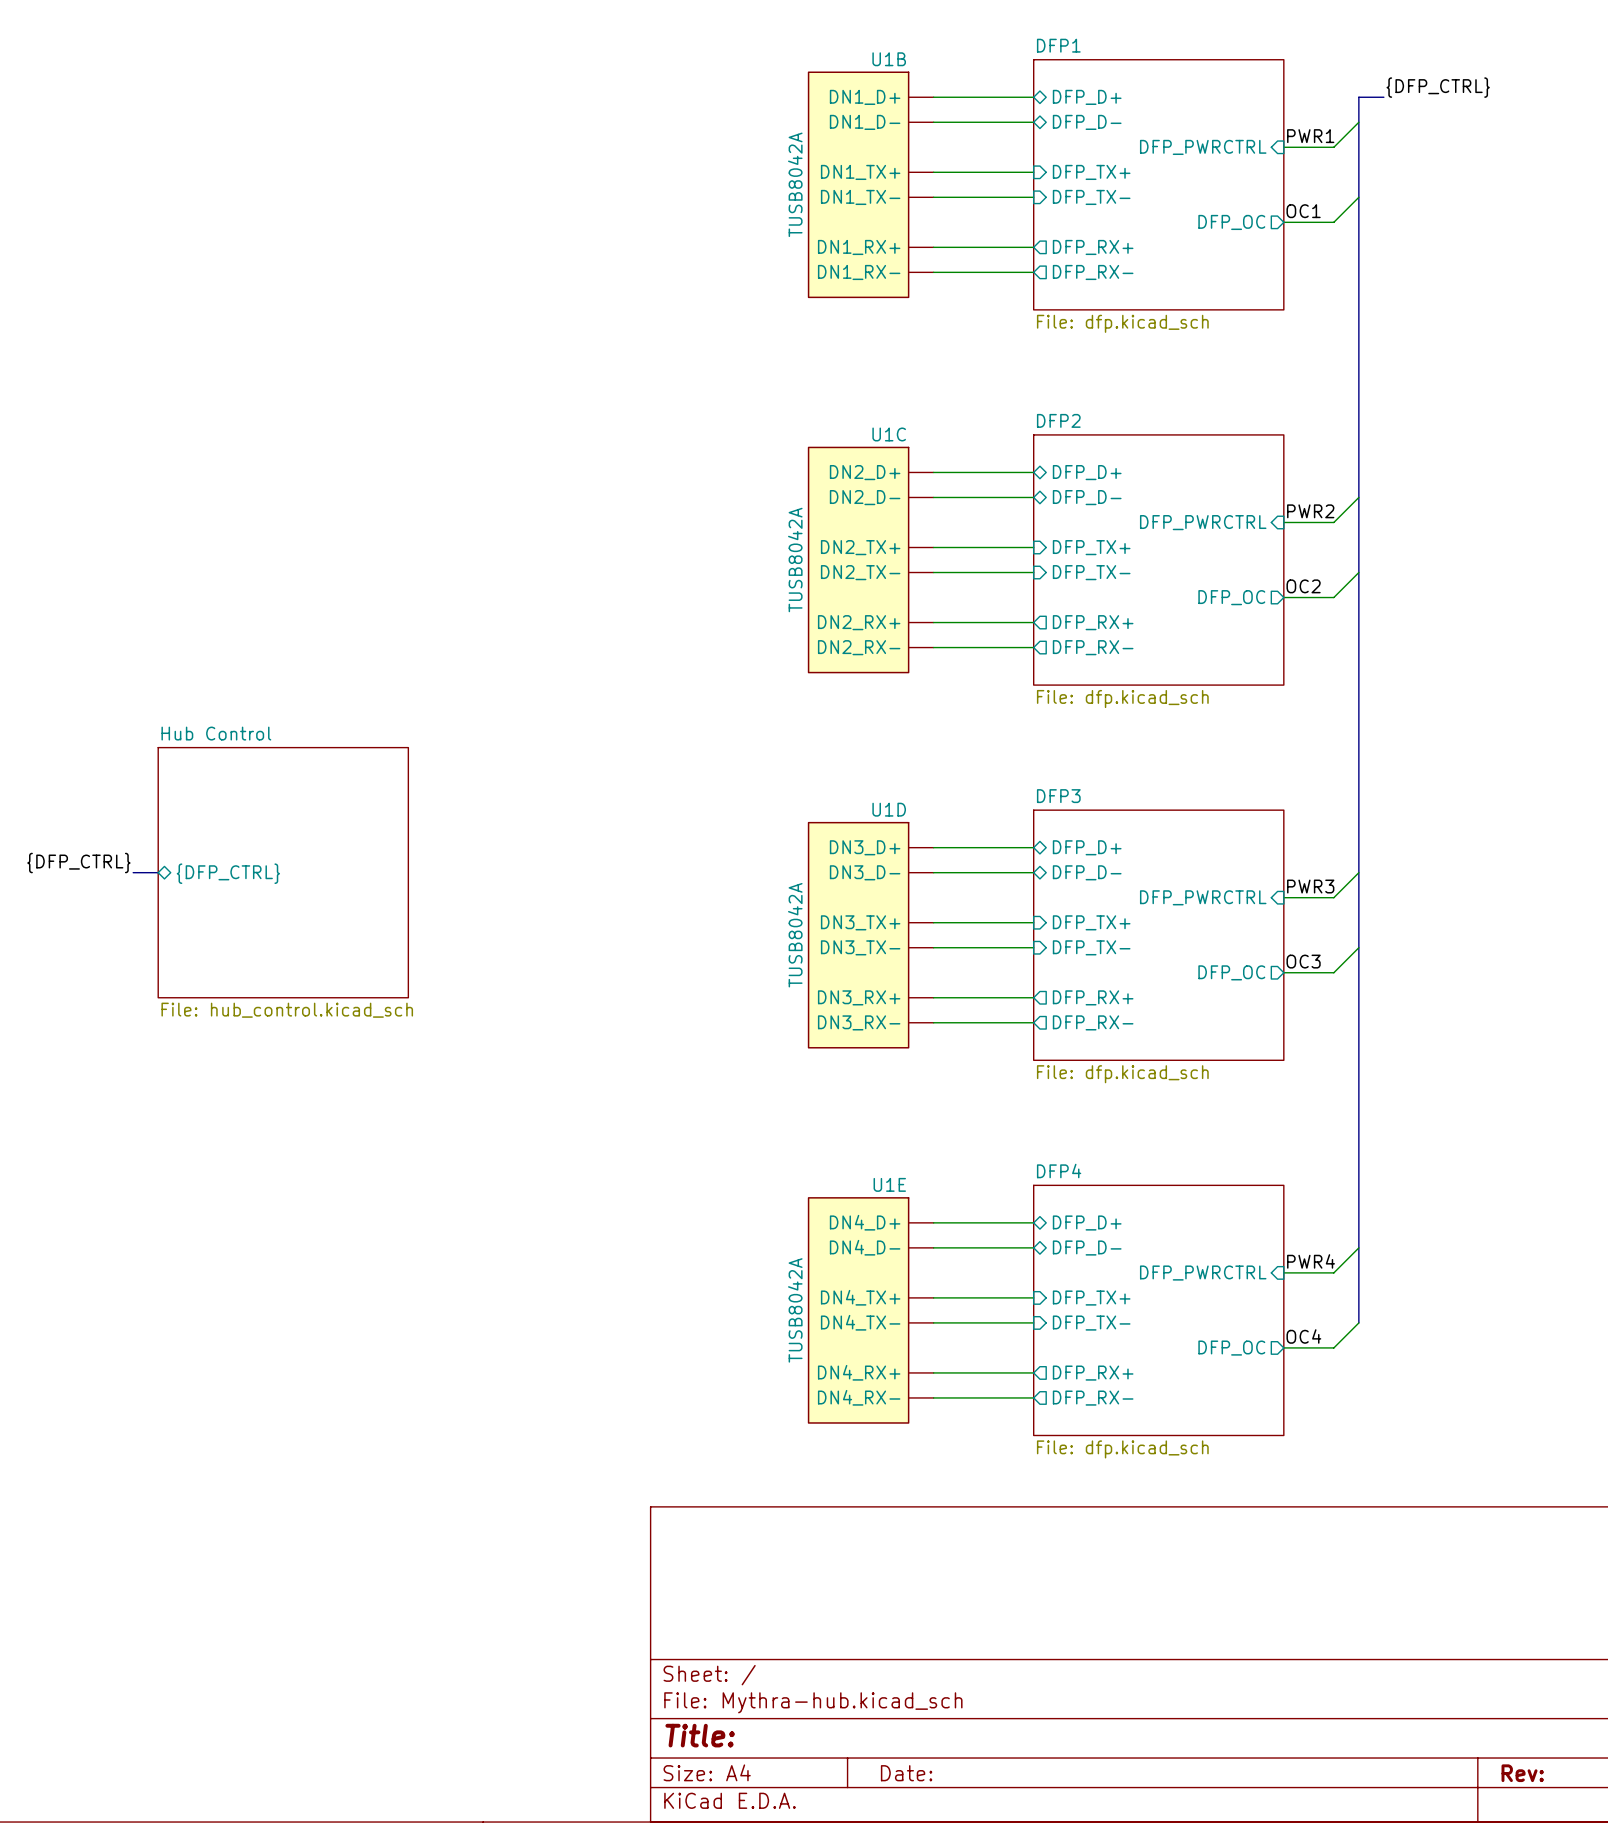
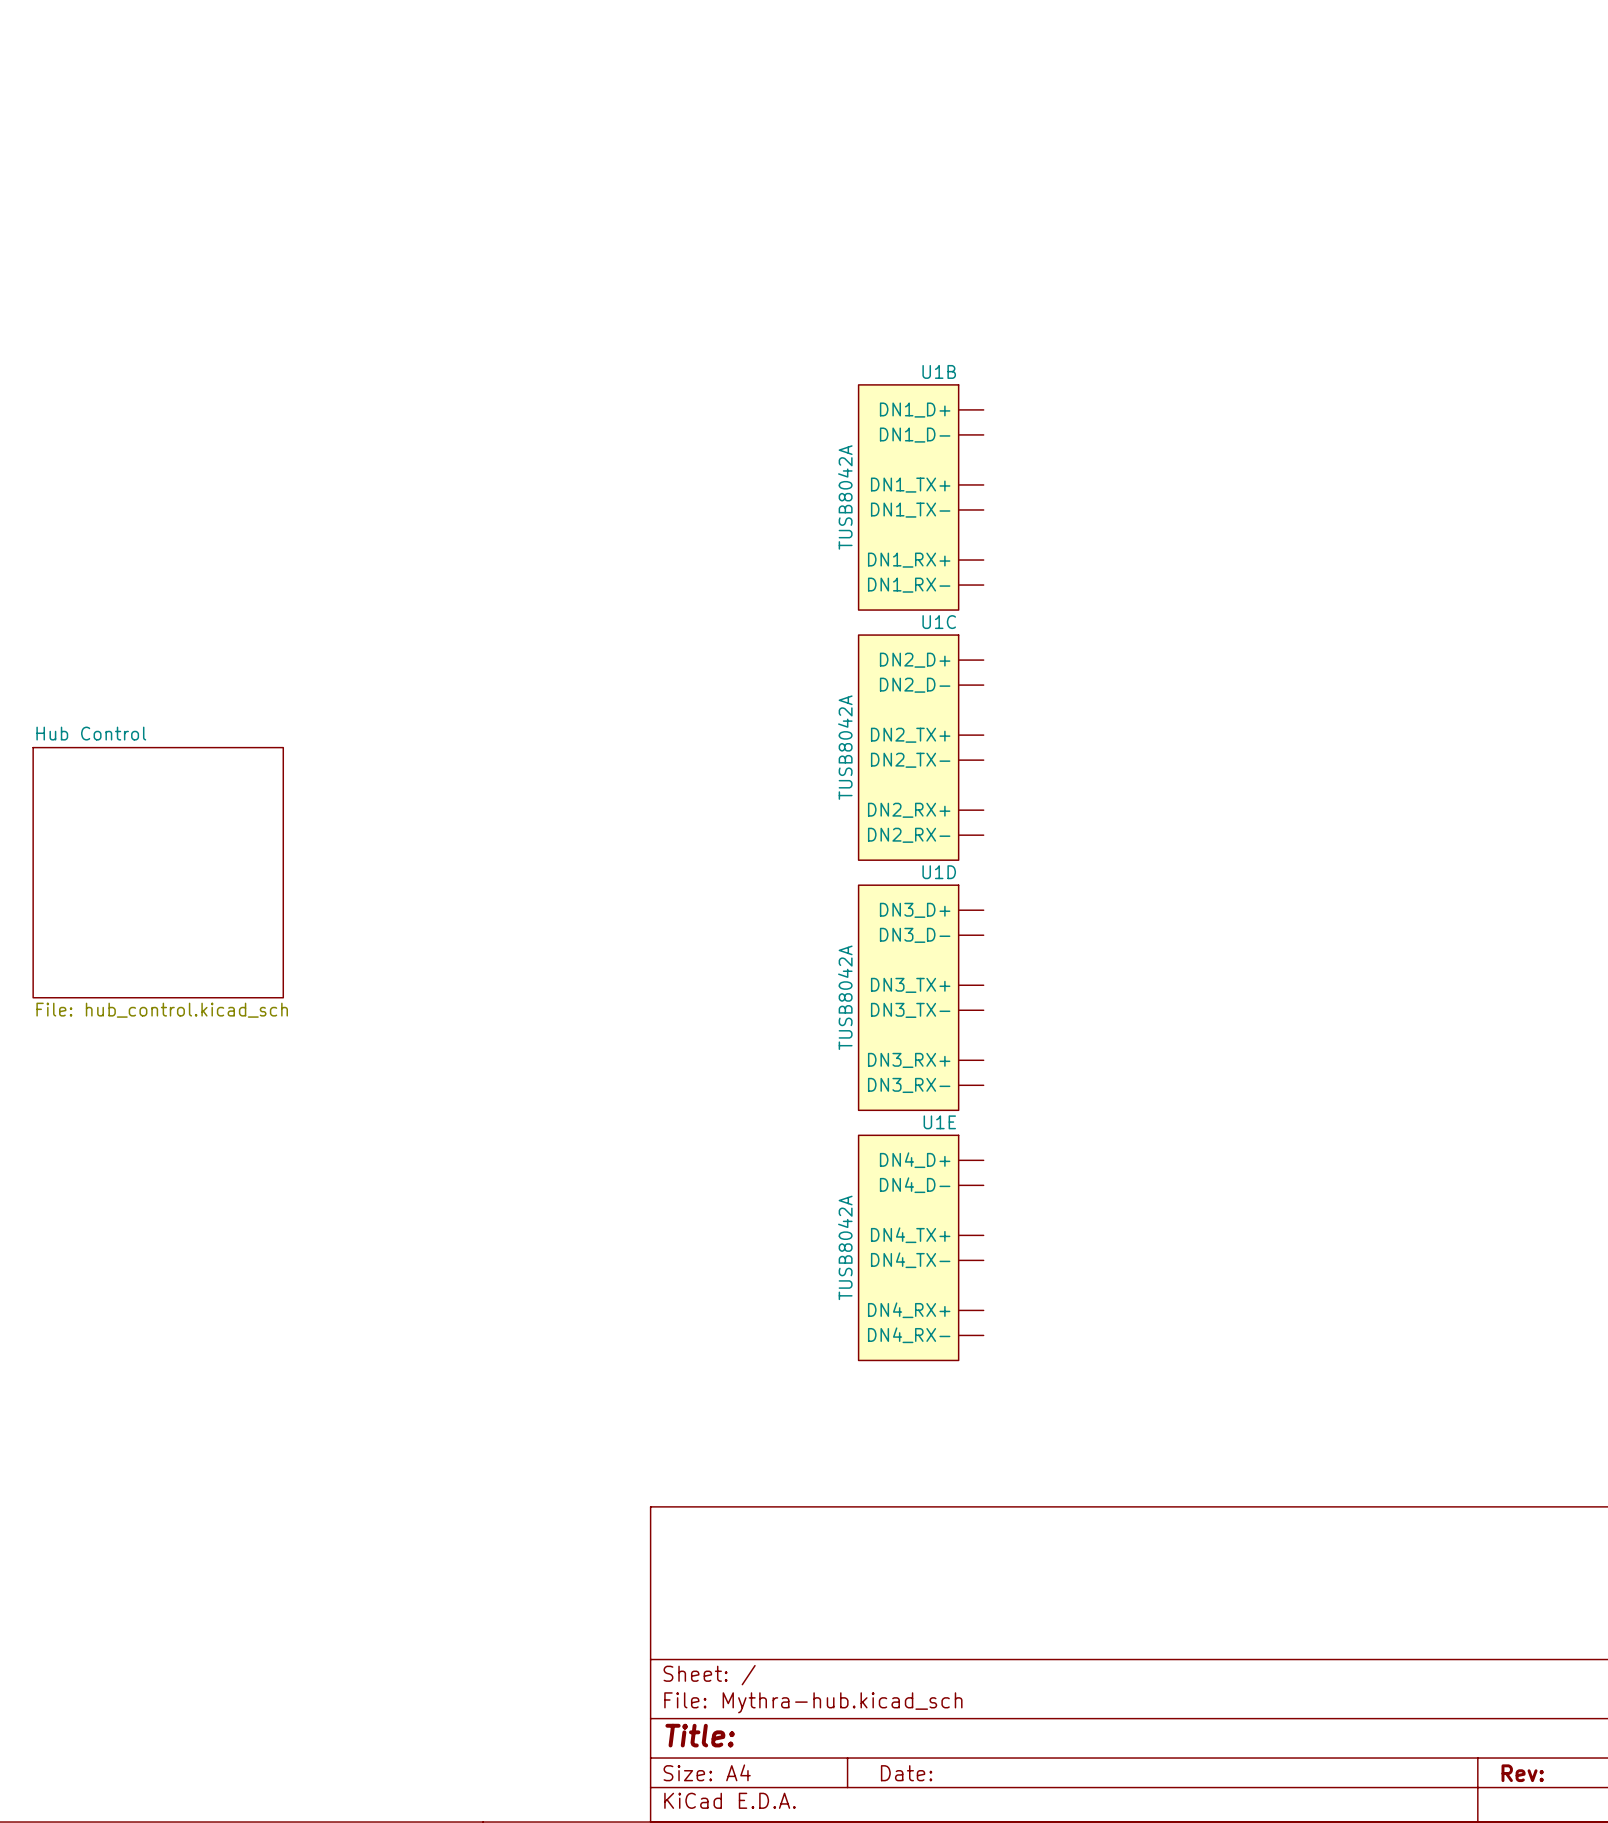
label: {DFP_CTRL} (1438, 87) -> none
wire: (933, 97) (1033, 97) -> none
sheet pin: DFP_D+ (1087, 97) -> none
bus: (1383, 97) (1358, 97) (1358, 1322) -> none
wire: (933, 122) (1033, 122) -> none
sheet pin: DFP_D- (1087, 122) -> none
wire: (1358, 122) (1333, 147) (1283, 147) -> none
label: PWR1 (1310, 136) -> none
sheet pin: DFP_PWRCTRL (1203, 147) -> none
wire: (933, 172) (1033, 172) -> none
sheet pin: DFP_TX+ (1091, 172) -> none
U1B position: (870, 184) -> (920, 497)
sheet DFP1: File: dfp.kicad_sch (1158, 184) -> none
wire: (933, 197) (1033, 197) -> none
sheet pin: DFP_TX- (1091, 197) -> none
wire: (1358, 197) (1333, 222) (1283, 222) -> none
label: OC1 (1303, 211) -> none
sheet pin: DFP_OC (1231, 222) -> none
wire: (933, 247) (1033, 247) -> none
sheet pin: DFP_RX+ (1093, 247) -> none
wire: (933, 272) (1033, 272) -> none
sheet pin: DFP_RX- (1093, 272) -> none
wire: (933, 472) (1033, 472) -> none
sheet pin: DFP_D+ (1087, 472) -> none
wire: (933, 497) (1033, 497) -> none
sheet pin: DFP_D- (1087, 497) -> none
wire: (1358, 497) (1333, 522) (1283, 522) -> none
label: PWR2 (1310, 511) -> none
sheet pin: DFP_PWRCTRL (1203, 522) -> none
wire: (933, 547) (1033, 547) -> none
sheet pin: DFP_TX+ (1091, 547) -> none
U1C position: (870, 560) -> (920, 747)
sheet DFP2: File: dfp.kicad_sch (1158, 560) -> none
wire: (933, 572) (1033, 572) -> none
sheet pin: DFP_TX- (1091, 572) -> none
wire: (1358, 572) (1333, 597) (1283, 597) -> none
label: OC2 (1303, 586) -> none
sheet pin: DFP_OC (1231, 597) -> none
wire: (933, 622) (1033, 622) -> none
sheet pin: DFP_RX+ (1093, 622) -> none
wire: (933, 647) (1033, 647) -> none
sheet pin: DFP_RX- (1093, 647) -> none
wire: (933, 847) (1033, 847) -> none
sheet pin: DFP_D+ (1087, 847) -> none
label: {DFP_CTRL} (78, 863) -> none
bus: (133, 872) (158, 872) -> none
sheet Hub Control position: (283, 872) -> (158, 872)
wire: (933, 872) (1033, 872) -> none
sheet pin: DFP_D- (1087, 872) -> none
wire: (1358, 872) (1333, 897) (1283, 897) -> none
sheet pin: {DFP_CTRL} (228, 873) -> none
label: PWR3 (1310, 886) -> none
sheet pin: DFP_PWRCTRL (1203, 897) -> none
wire: (933, 922) (1033, 922) -> none
sheet pin: DFP_TX+ (1091, 922) -> none
U1D position: (870, 935) -> (920, 997)
sheet DFP3: File: dfp.kicad_sch (1158, 935) -> none
wire: (933, 947) (1033, 947) -> none
sheet pin: DFP_TX- (1091, 947) -> none
wire: (1358, 947) (1333, 972) (1283, 972) -> none
label: OC3 (1303, 961) -> none
sheet pin: DFP_OC (1231, 972) -> none
wire: (933, 997) (1033, 997) -> none
sheet pin: DFP_RX+ (1093, 997) -> none
wire: (933, 1022) (1033, 1022) -> none
sheet pin: DFP_RX- (1093, 1022) -> none
wire: (933, 1222) (1033, 1222) -> none
sheet pin: DFP_D+ (1087, 1223) -> none
wire: (933, 1247) (1033, 1247) -> none
wire: (1358, 1247) (1333, 1272) (1283, 1272) -> none
sheet pin: DFP_D- (1087, 1248) -> none
label: PWR4 (1311, 1261) -> none
sheet pin: DFP_PWRCTRL (1203, 1273) -> none
wire: (933, 1297) (1033, 1297) -> none
sheet pin: DFP_TX+ (1091, 1298) -> none
U1E position: (870, 1310) -> (920, 1247)
sheet DFP4: File: dfp.kicad_sch (1158, 1310) -> none
wire: (933, 1322) (1033, 1322) -> none
wire: (1358, 1322) (1333, 1347) (1283, 1347) -> none
sheet pin: DFP_TX- (1091, 1323) -> none
label: OC4 (1303, 1336) -> none
sheet pin: DFP_OC (1231, 1348) -> none
wire: (933, 1372) (1033, 1372) -> none
sheet pin: DFP_RX+ (1093, 1373) -> none
wire: (933, 1397) (1033, 1397) -> none
sheet pin: DFP_RX- (1093, 1398) -> none

